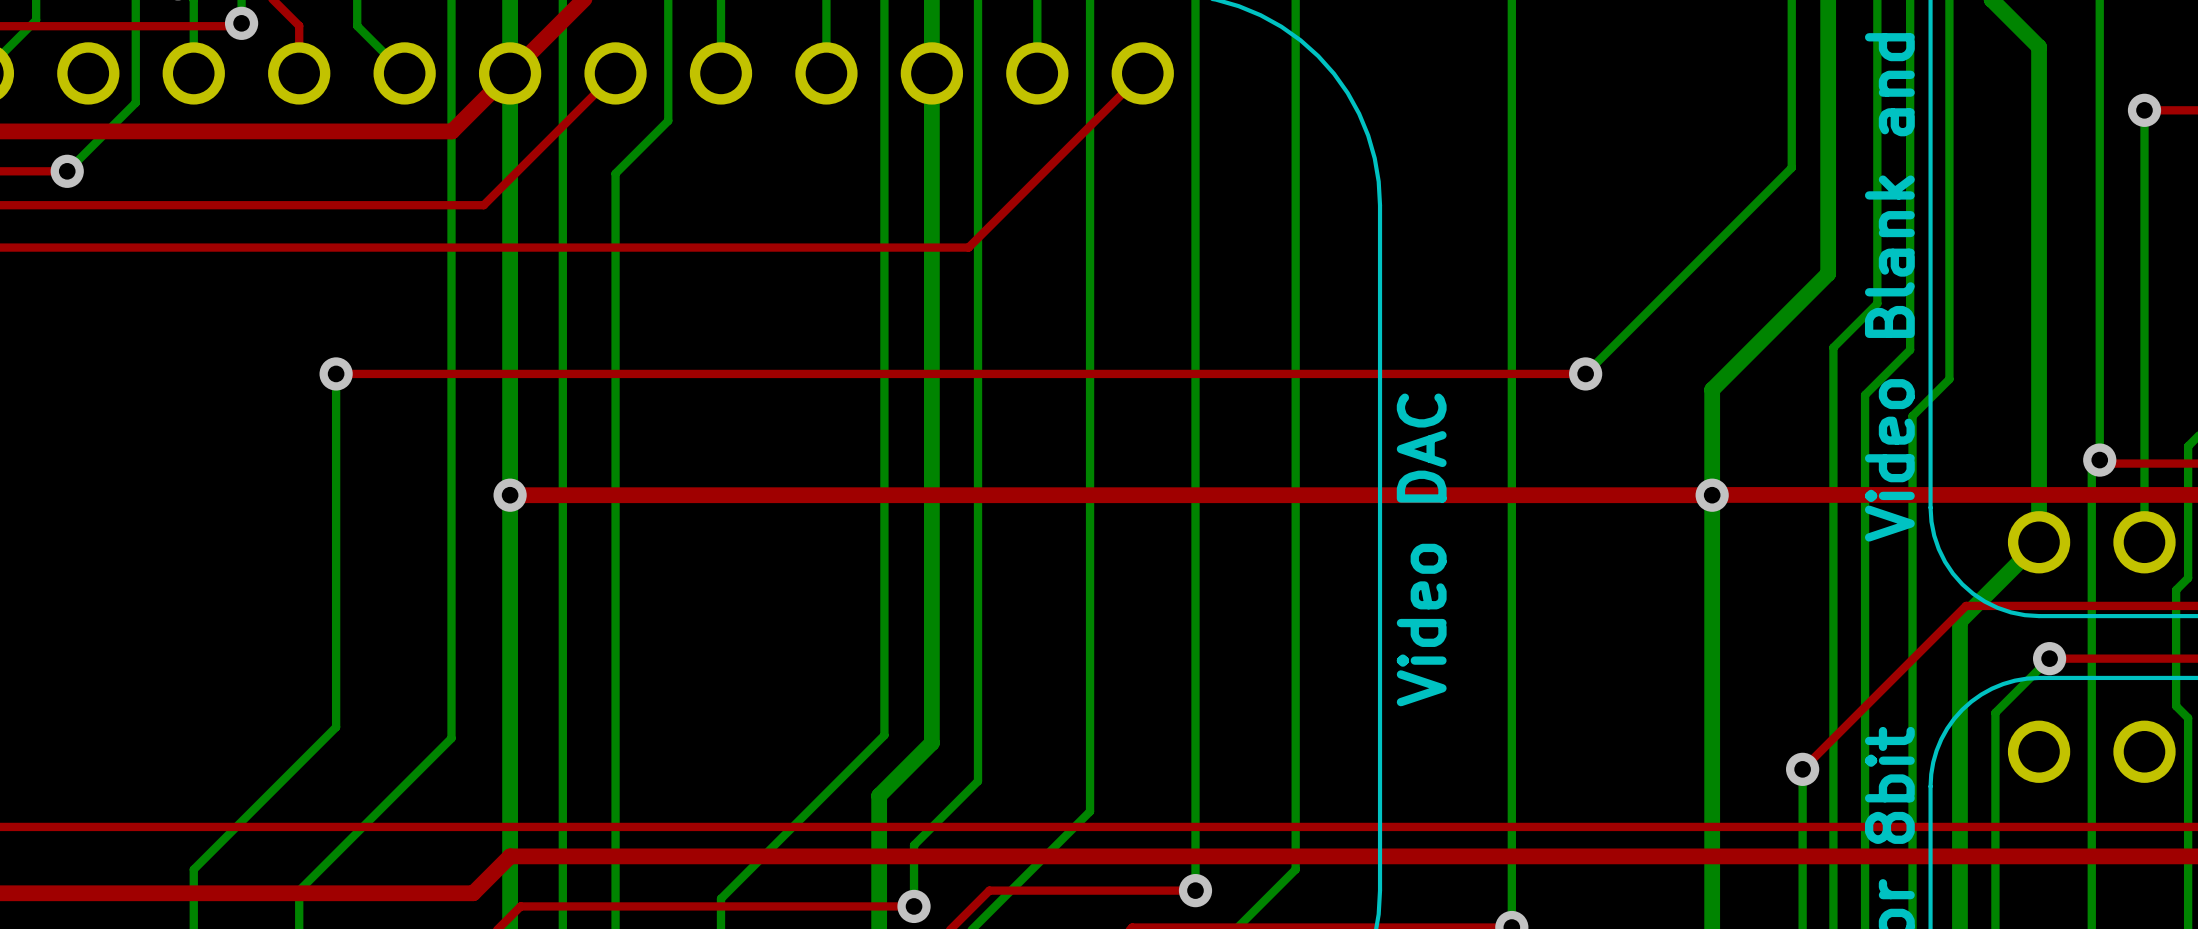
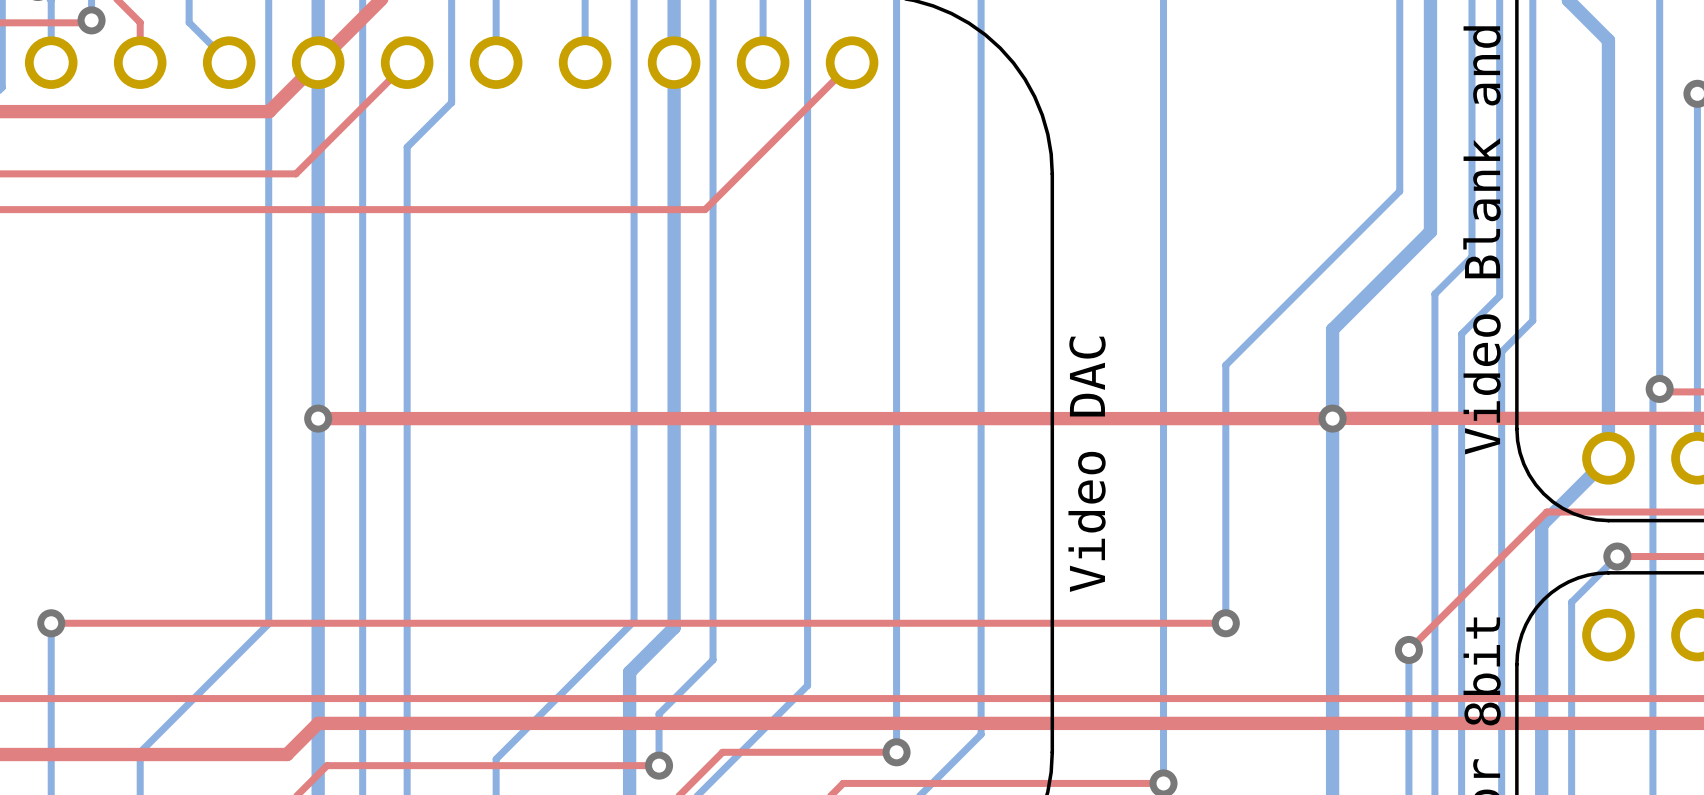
bottom track: (1791, 167) (1585, 373) -> (1399, 142) (1399, 191) (1225, 365) (1225, 623)
bottom track: (336, 373) (336, 727) (193, 869) -> (51, 623) (51, 734)
top track: (336, 373) (1585, 373) -> none
via: (336, 373) -> none
via: (1585, 373) -> none
top track: none -> (51, 623) (1225, 623)
via: none -> (51, 623)
via: none -> (1225, 623)

